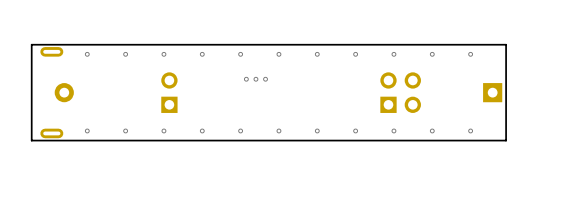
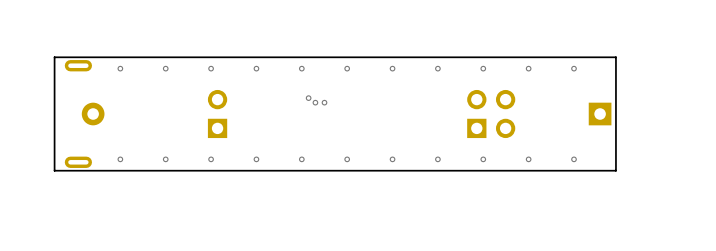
via: (255, 79) -> none
via: (265, 79) -> none
via: none -> (315, 102)
via: none -> (324, 102)

